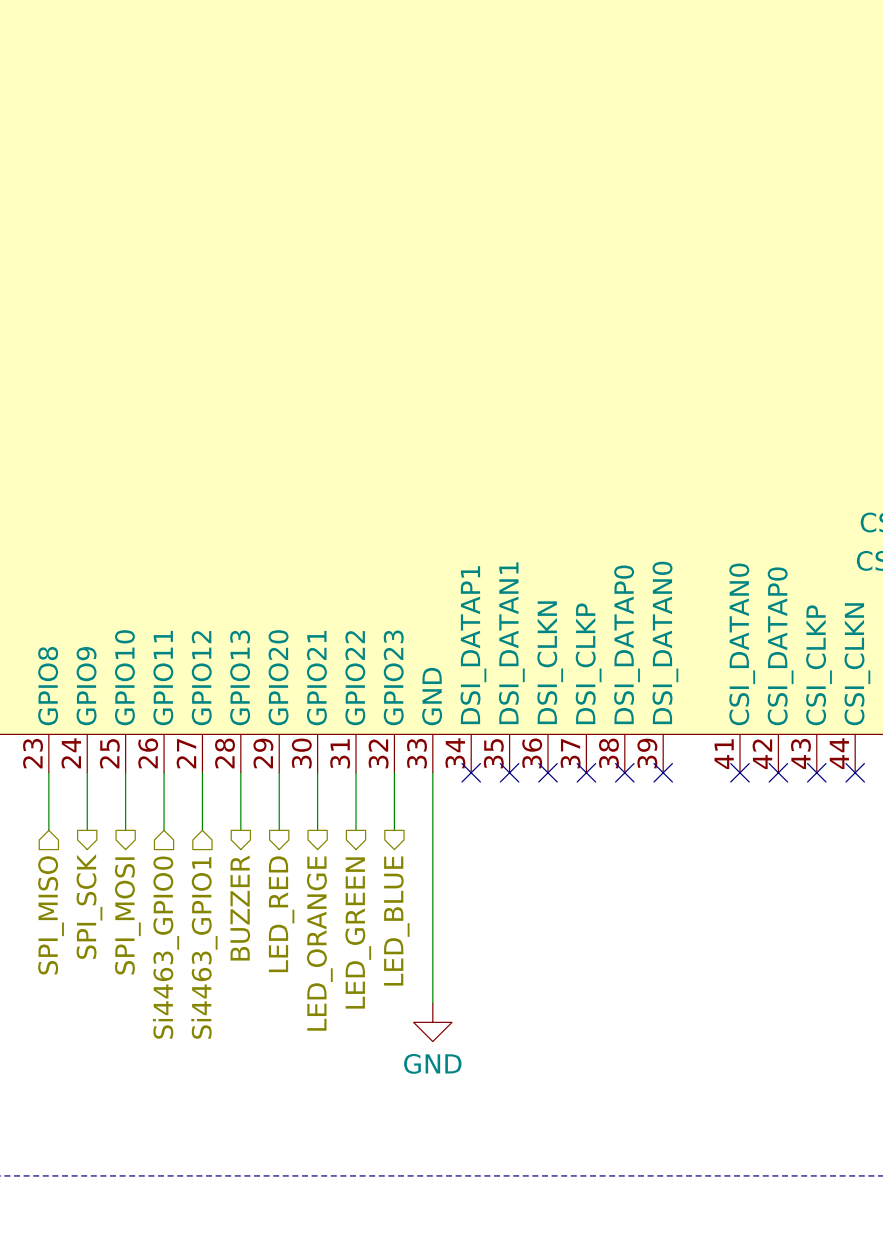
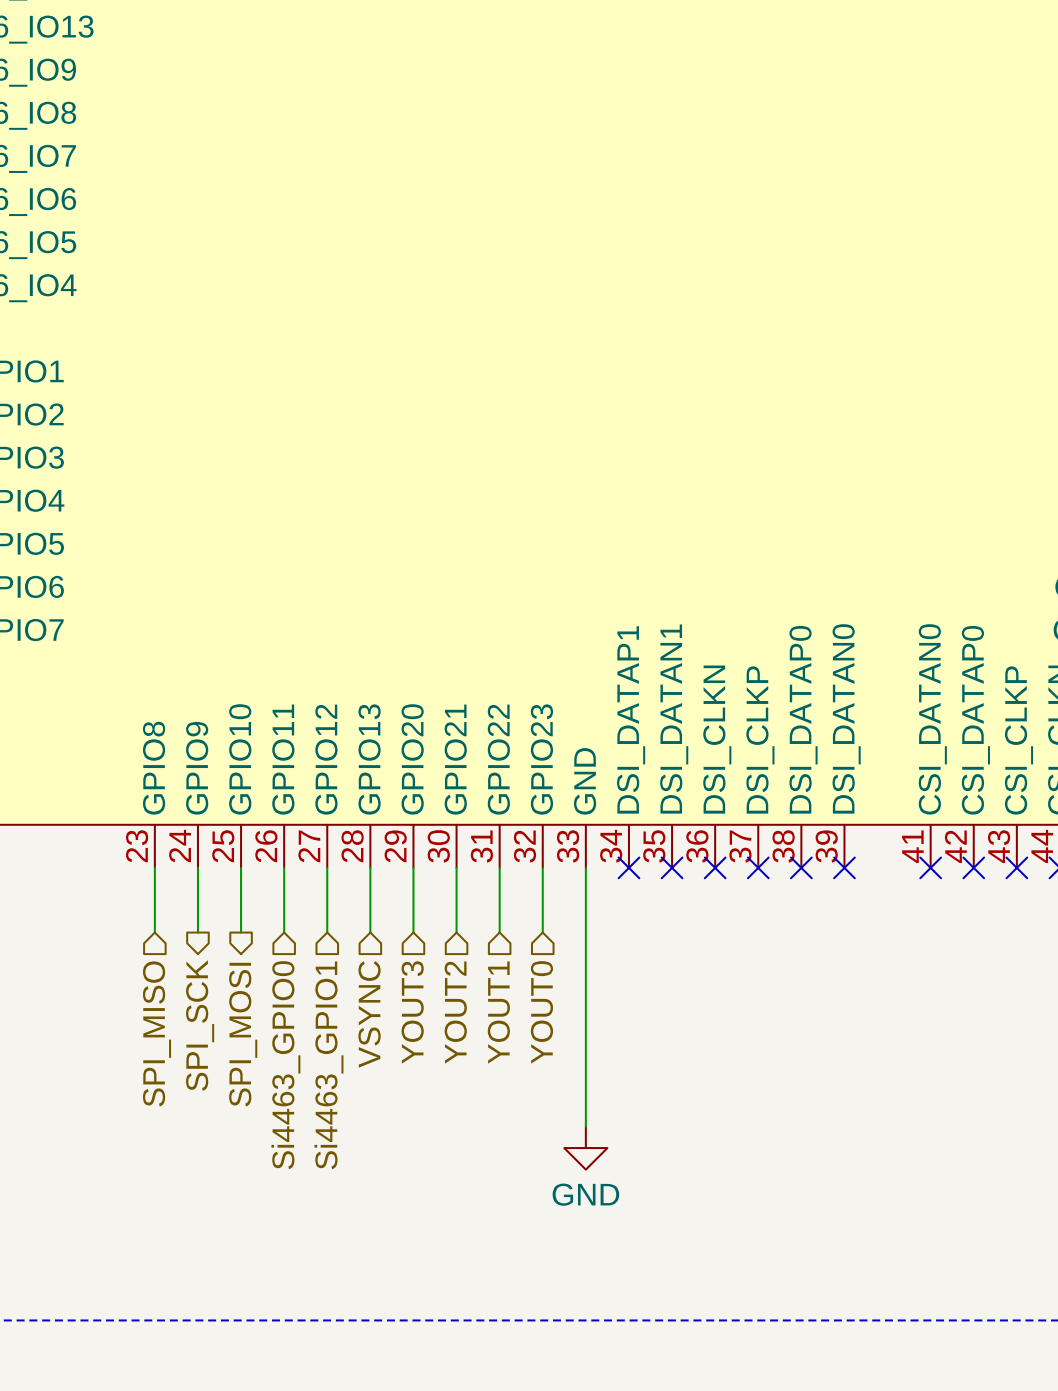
hierarchical label shape: output (240, 908) -> input (369, 1014)
hierarchical label: BUZZER (240, 908) -> VSYNC (369, 1014)
hierarchical label shape: output (281, 914) -> input (412, 1012)
hierarchical label: LED_RED (281, 914) -> YOUT3 (412, 1012)
hierarchical label shape: output (396, 921) -> input (541, 1012)
hierarchical label: LED_BLUE (396, 921) -> YOUT0 (541, 1012)
hierarchical label shape: output (358, 932) -> input (498, 1012)
hierarchical label: LED_GREEN (358, 932) -> YOUT1 (498, 1012)
hierarchical label shape: output (319, 943) -> input (455, 1012)
hierarchical label: LED_ORANGE (319, 943) -> YOUT2 (455, 1012)

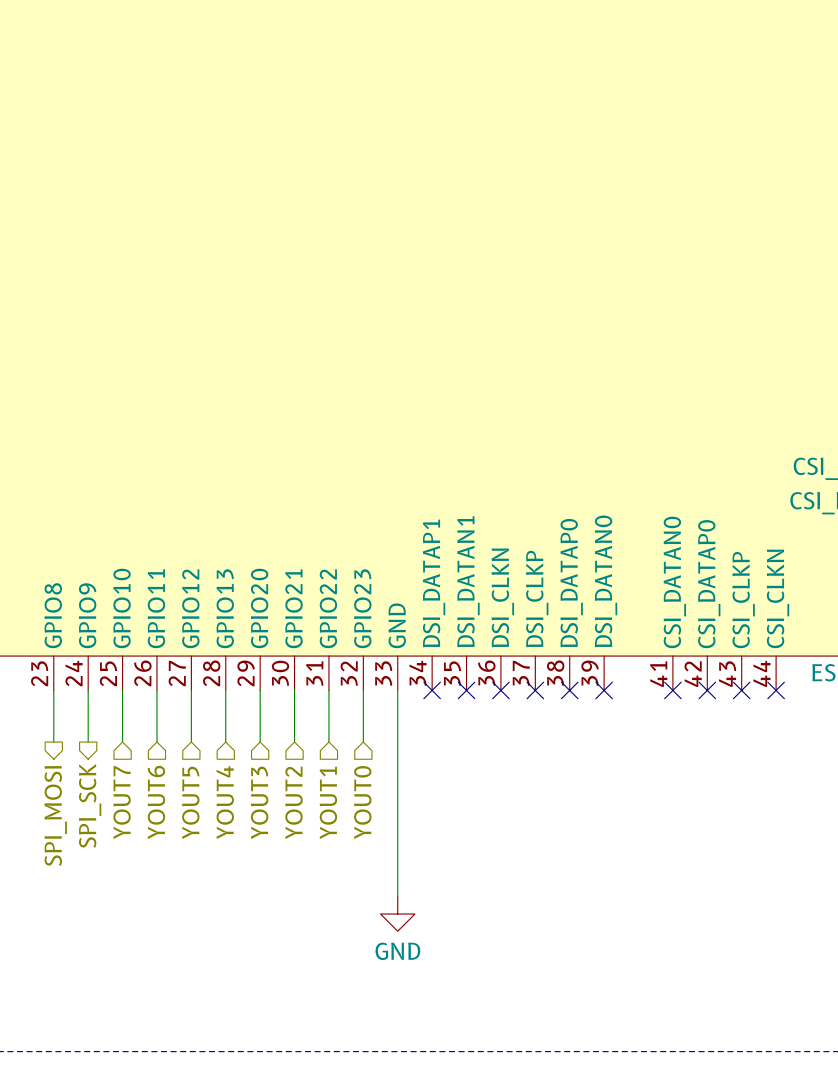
hierarchical label: VSYNC (369, 1014) -> YOUT4 (225, 802)
hierarchical label shape: input (157, 1033) -> output (55, 816)
hierarchical label: SPI_MISO (157, 1033) -> SPI_MOSI (55, 816)
hierarchical label shape: output (243, 1034) -> input (122, 802)
hierarchical label: SPI_MOSI (243, 1034) -> YOUT7 (122, 802)
hierarchical label: Si4463_GPIO0 (285, 1065) -> YOUT6 (156, 802)
hierarchical label: Si4463_GPIO1 (328, 1065) -> YOUT5 (190, 802)

